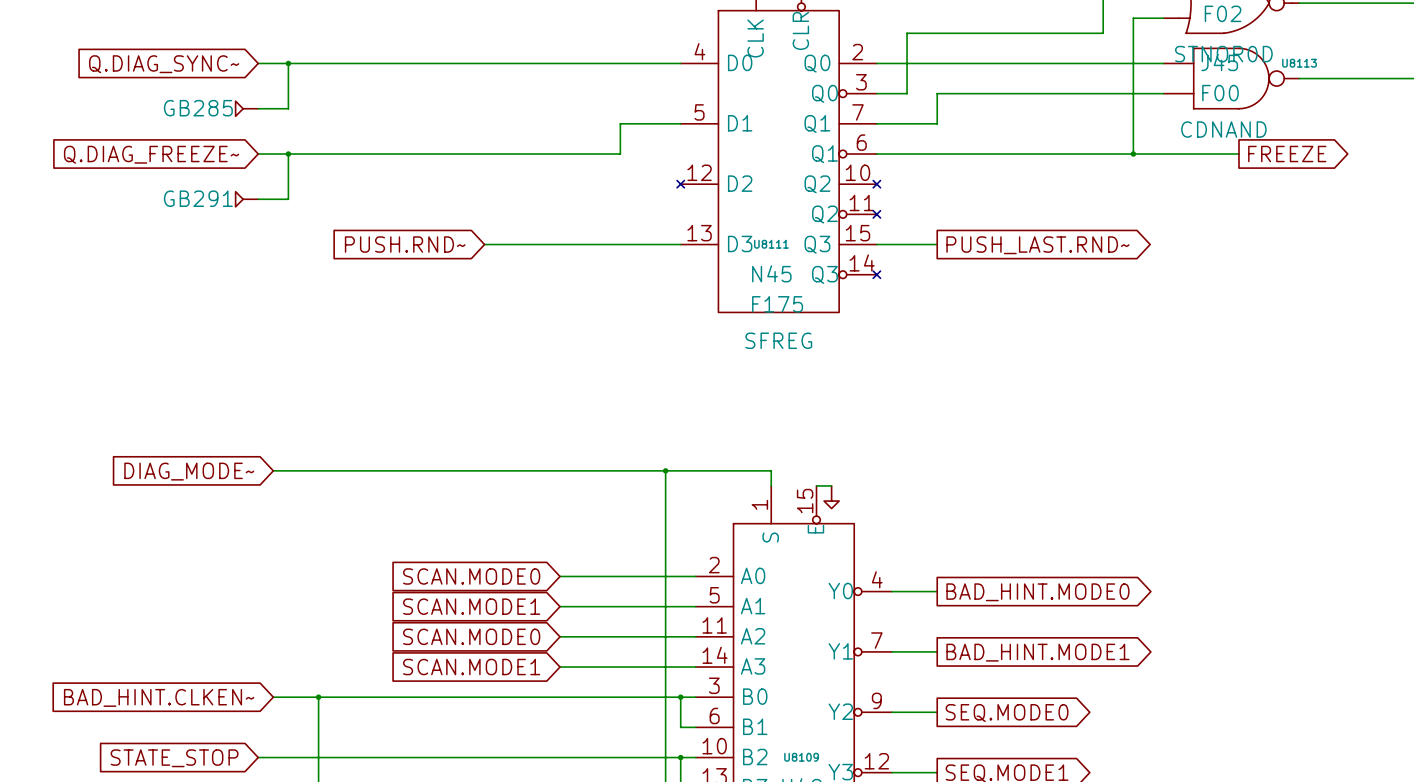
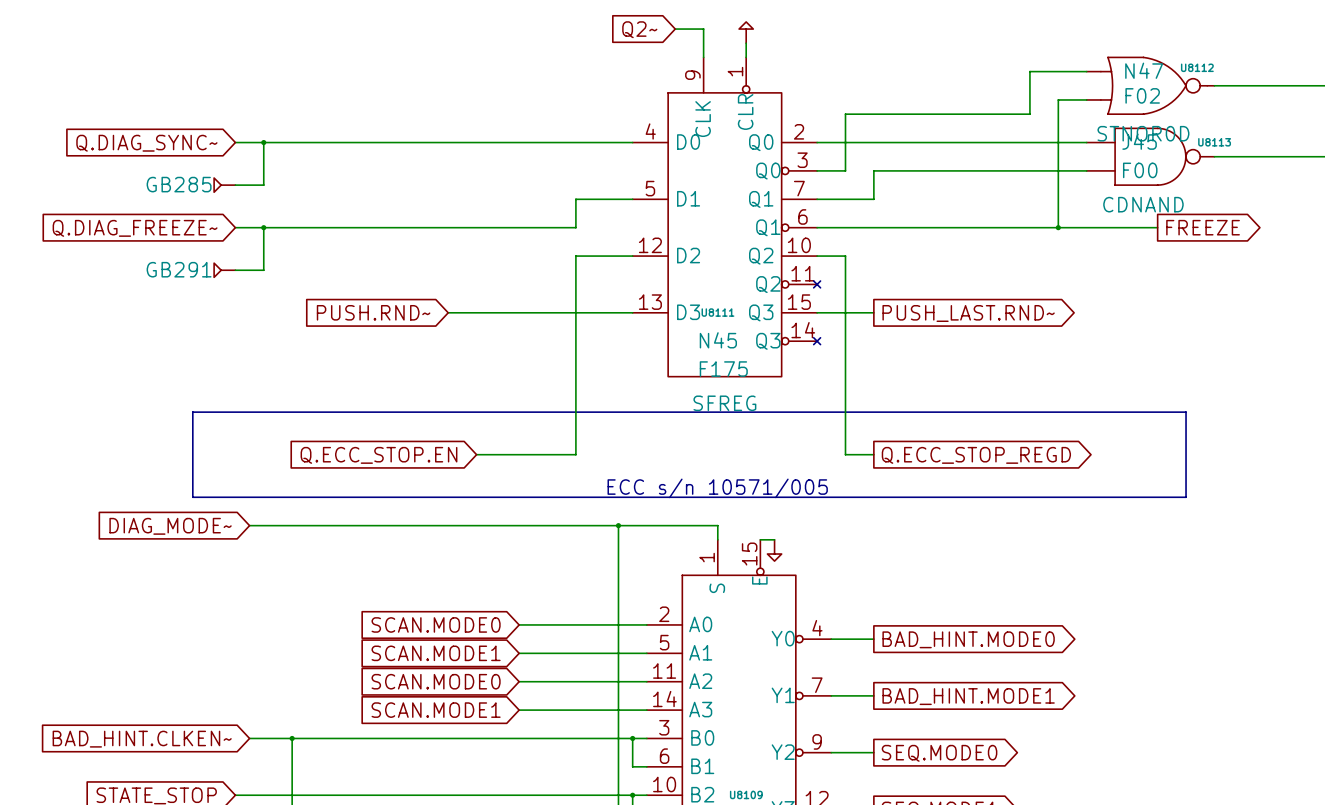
wire: none -> (632, 256) (575, 256) (575, 454) (476, 454)
no-connect mark: (680, 184) -> none
wire: none -> (817, 256) (845, 256) (845, 454) (873, 454)
no-connect mark: (876, 184) -> none
line: none -> (192, 412) (1186, 412) (1186, 497) (192, 497) (192, 412)
global label: none -> Q.ECC_STOP.EN (378, 455)
global label: none -> Q.ECC_STOP_REGD (976, 455)
text: none -> ECC s/n 10571/005 (717, 488)

